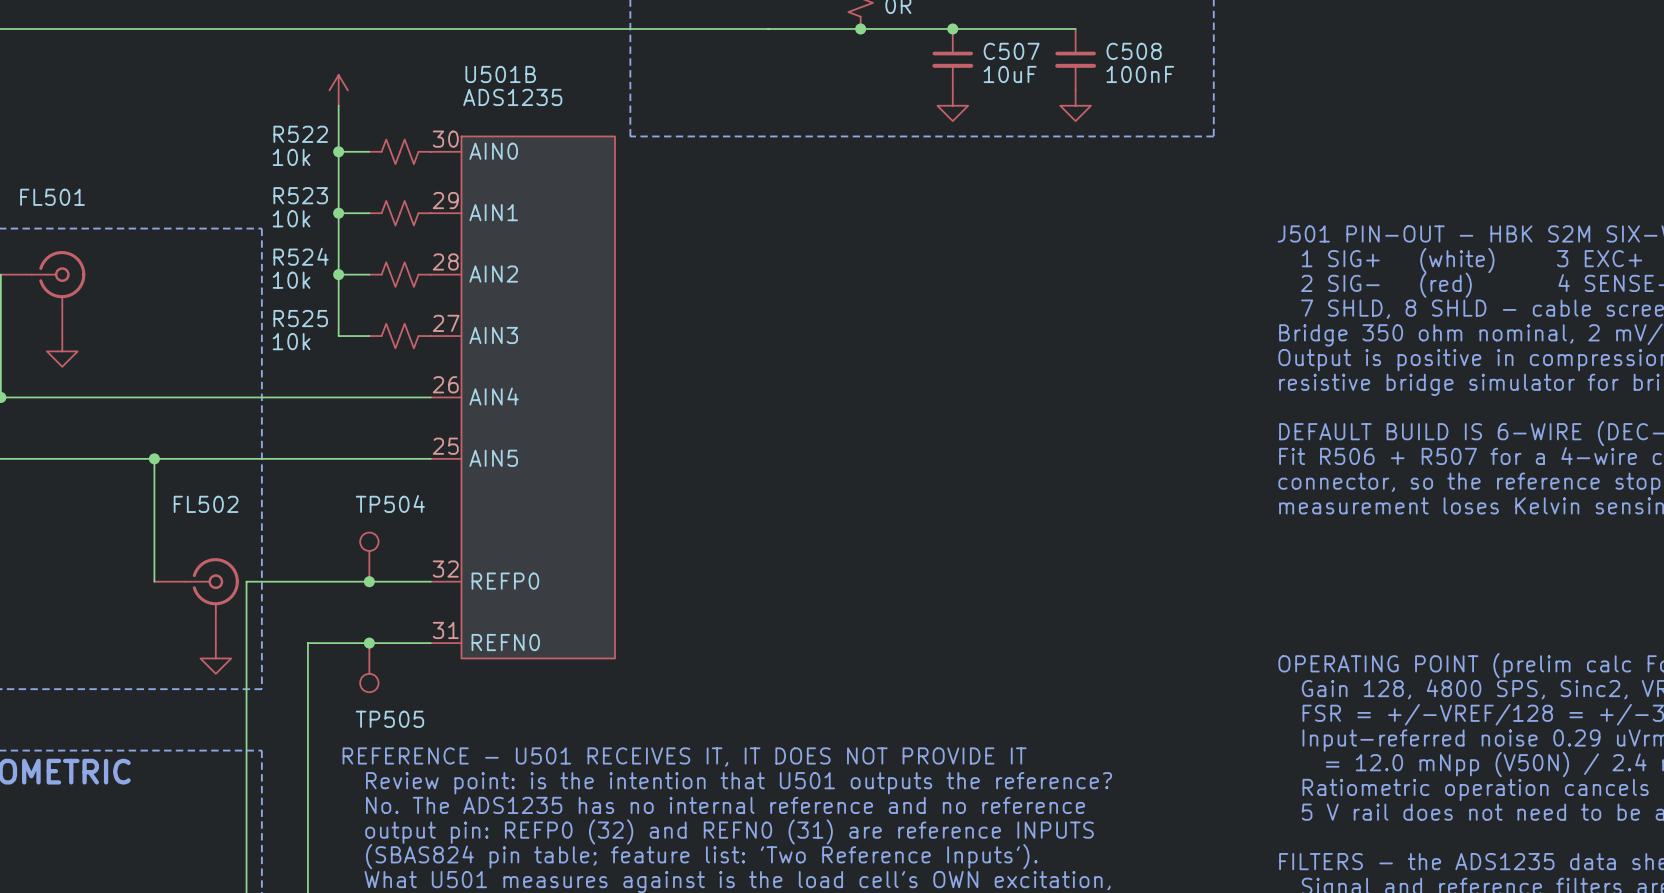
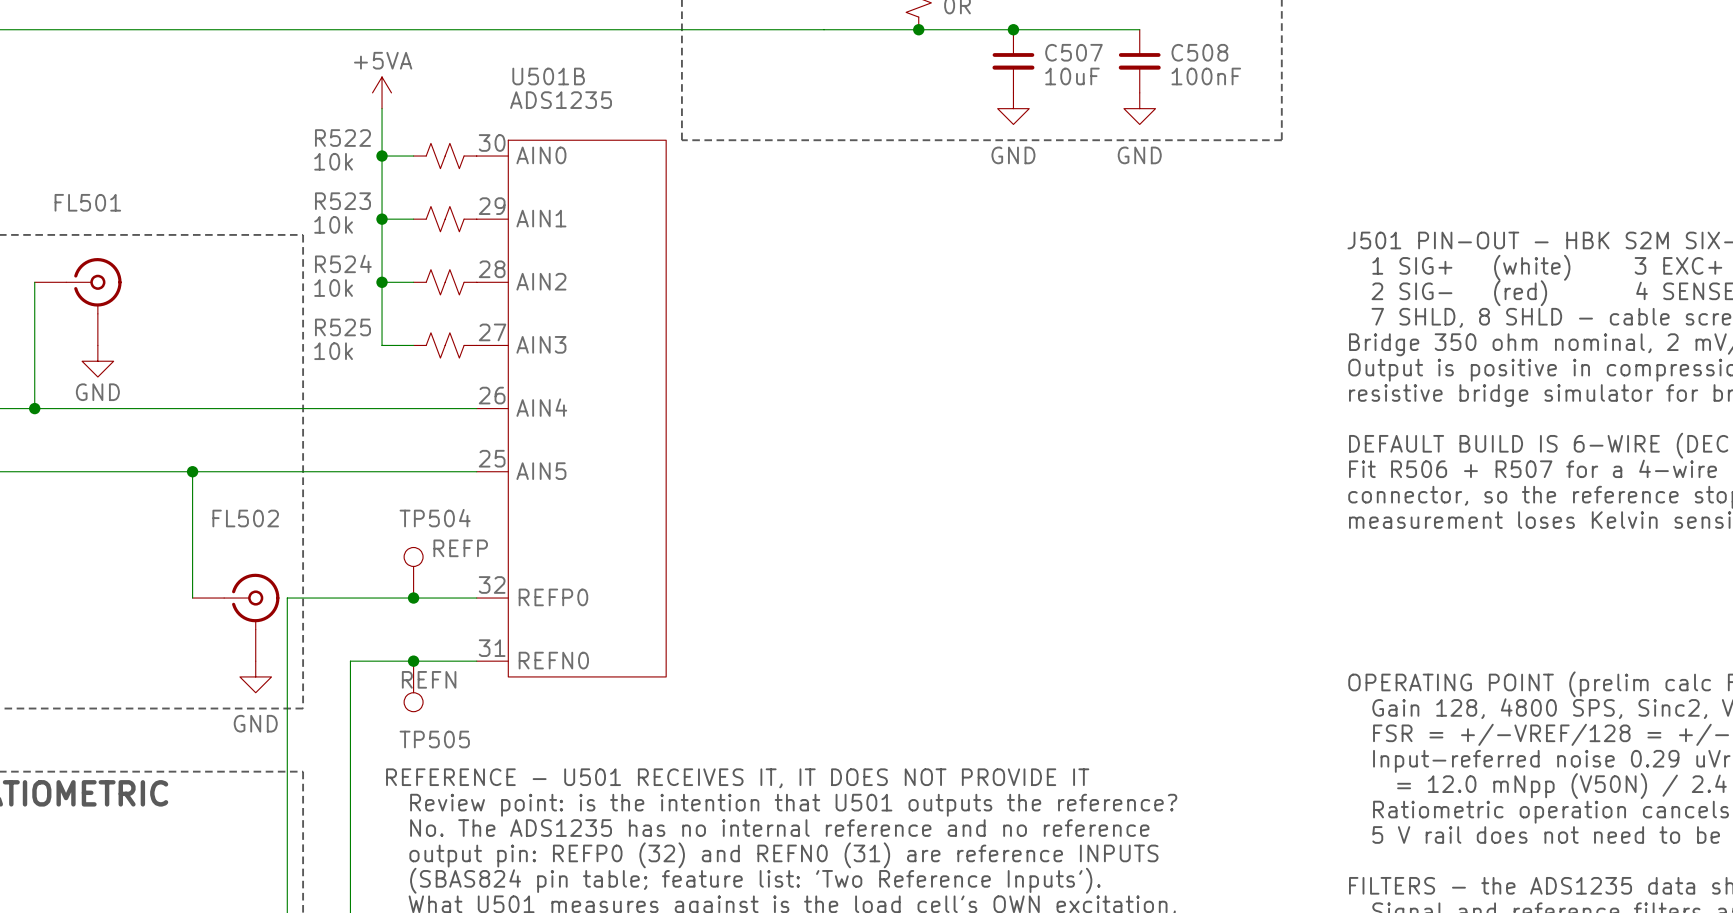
power symbol text: none -> +5VA (383, 60)
power symbol text: none -> GND (1013, 155)
power symbol text: none -> GND (1139, 155)
power symbol text: none -> GND (97, 392)
TP504 value: none -> REFP (460, 548)
TP505 value: none -> REFN (429, 679)
power symbol text: none -> GND (255, 723)

